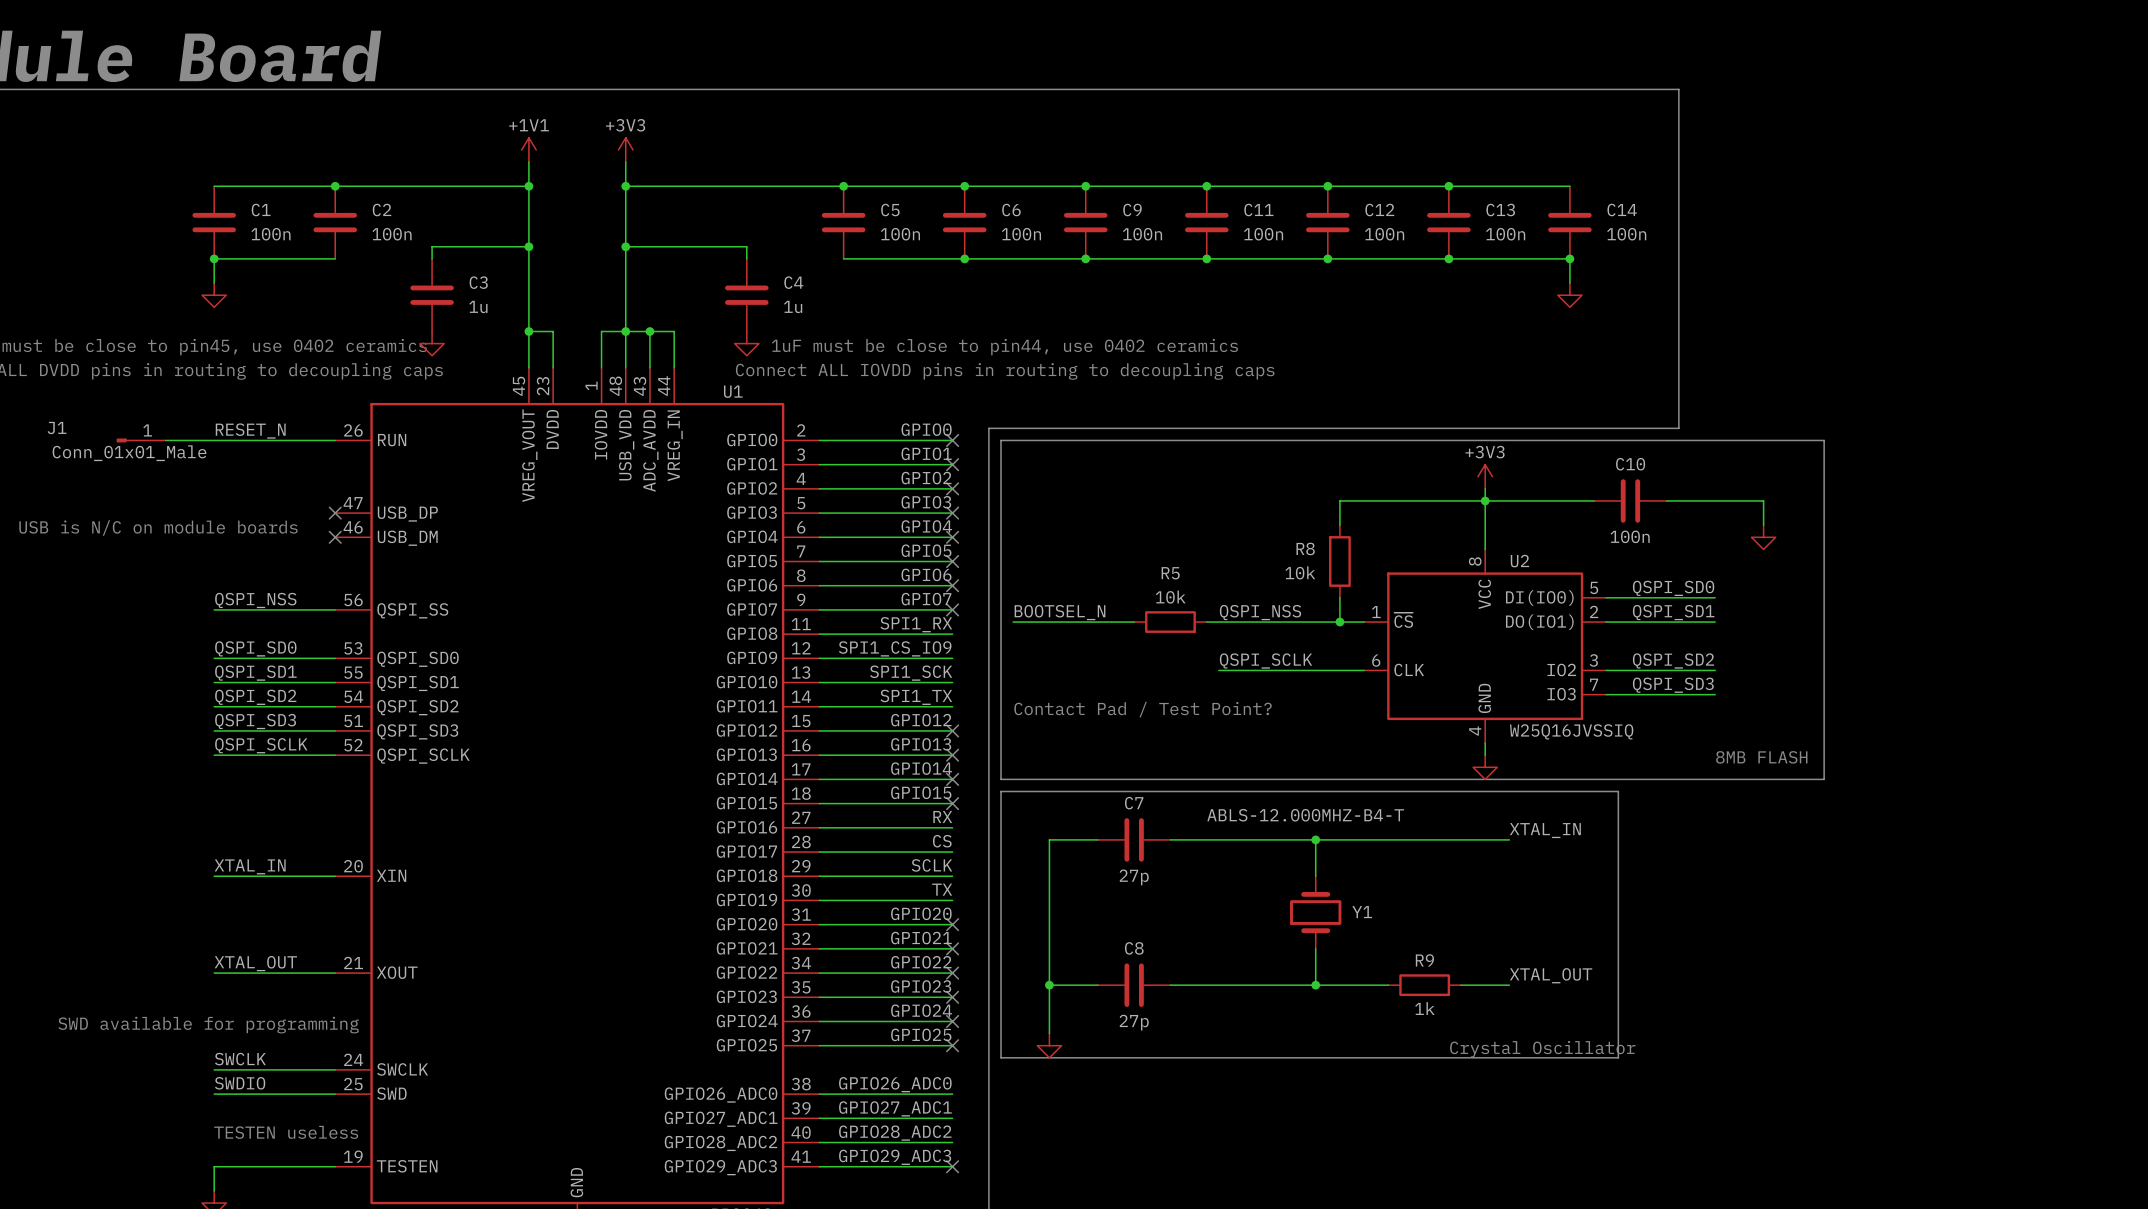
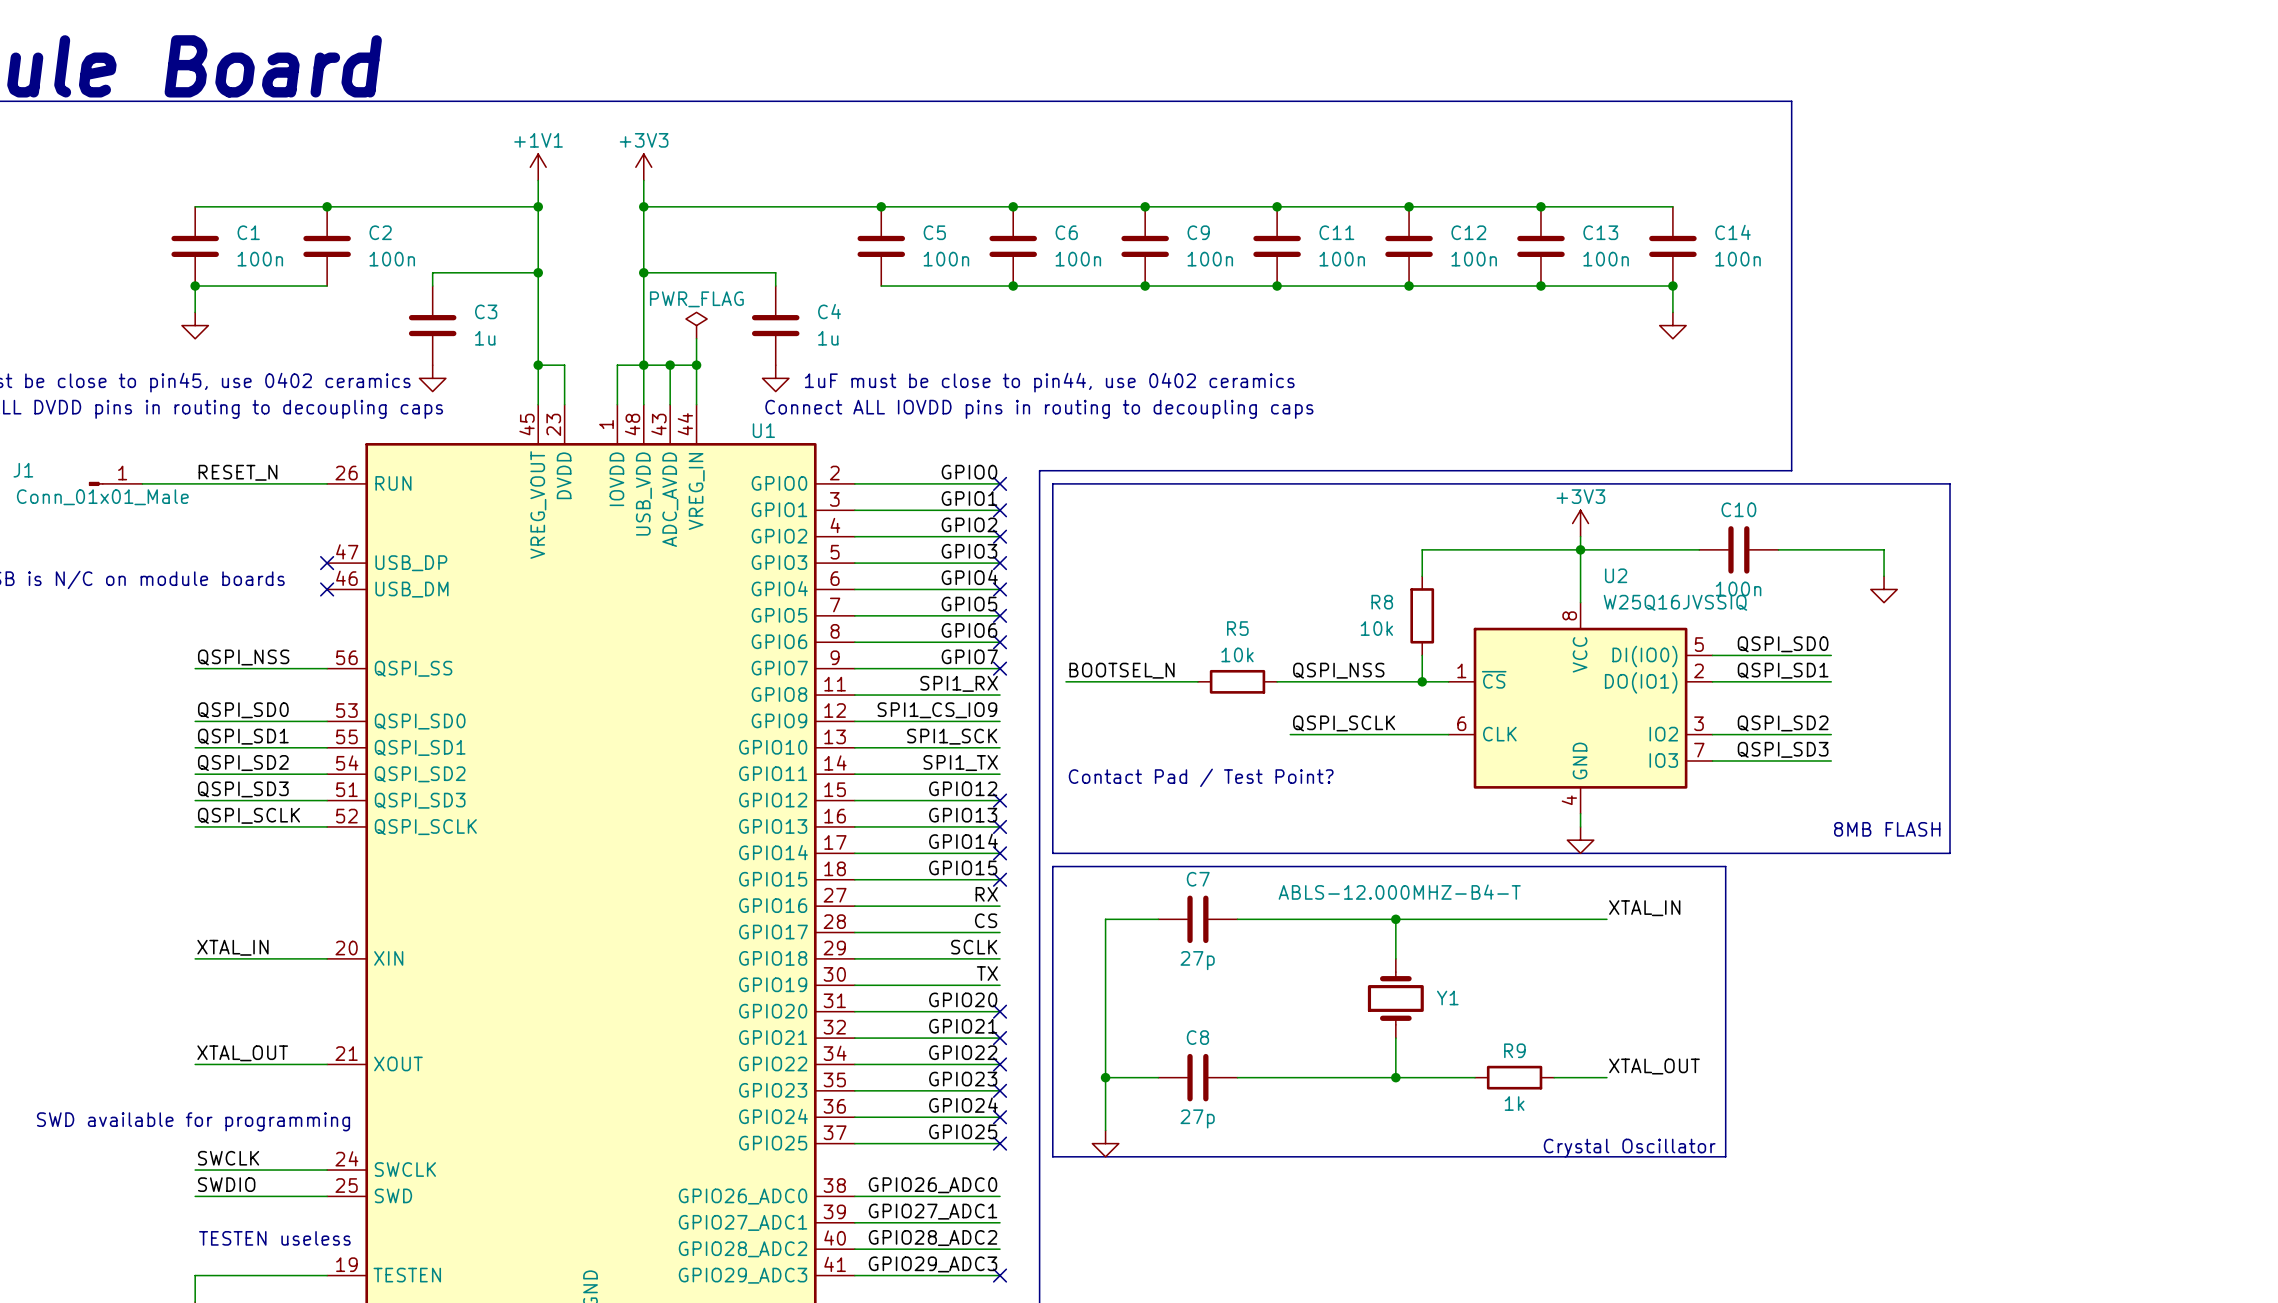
power symbol: none -> PWR_FLAG (696, 325)
wire: none -> (696, 338) (696, 365)
junction: none -> (696, 365)
U2 name position: U2 (1519, 561) -> U2 (1616, 575)
U2 value position: W25Q16JVSSIQ (1571, 731) -> W25Q16JVSSIQ (1675, 602)

